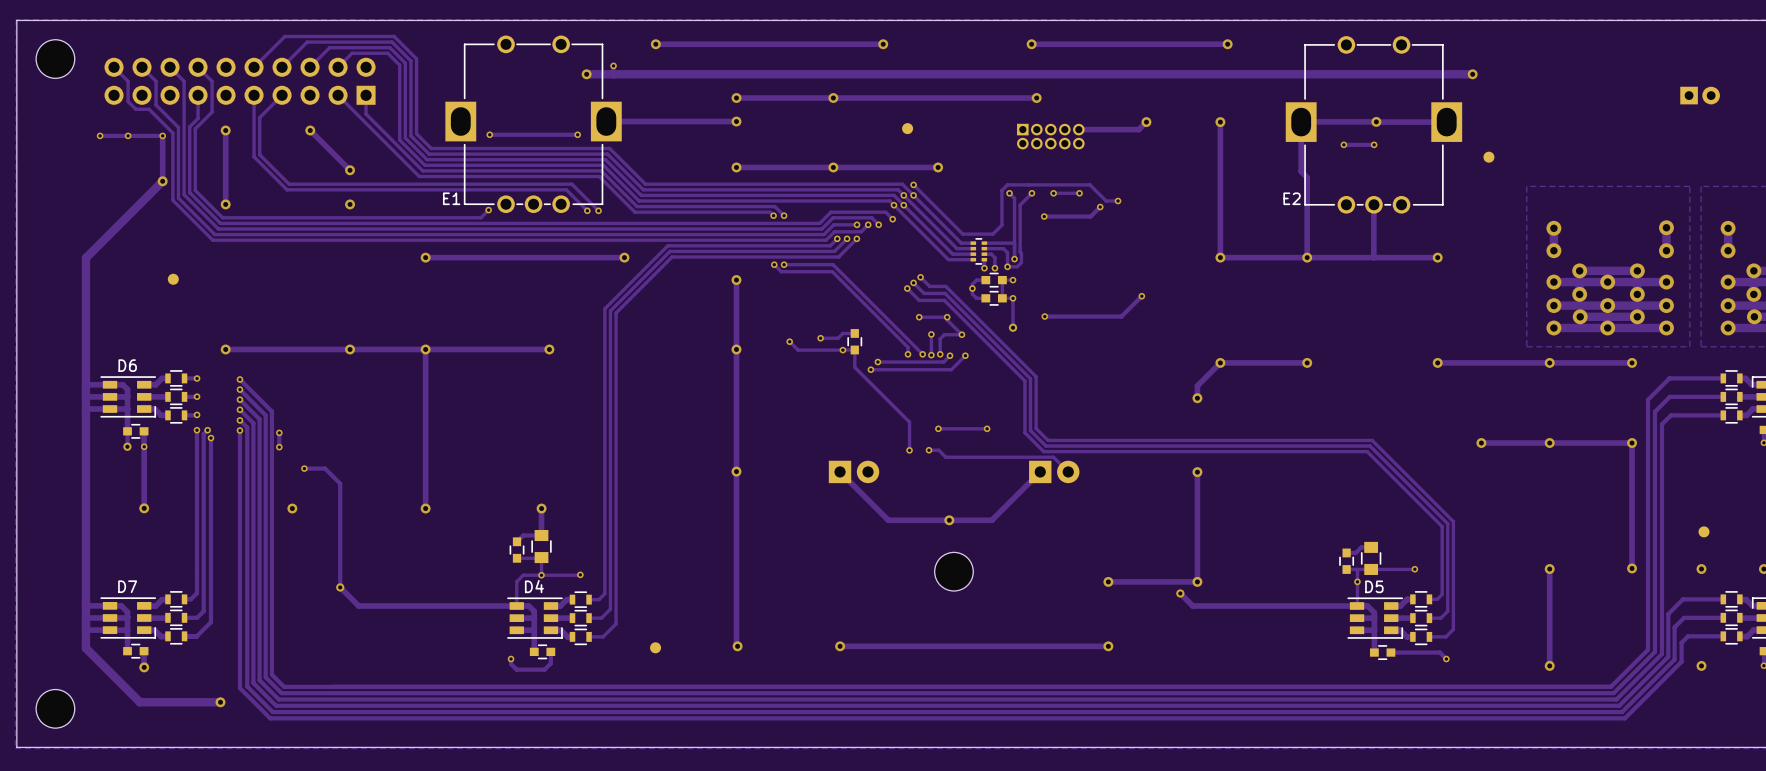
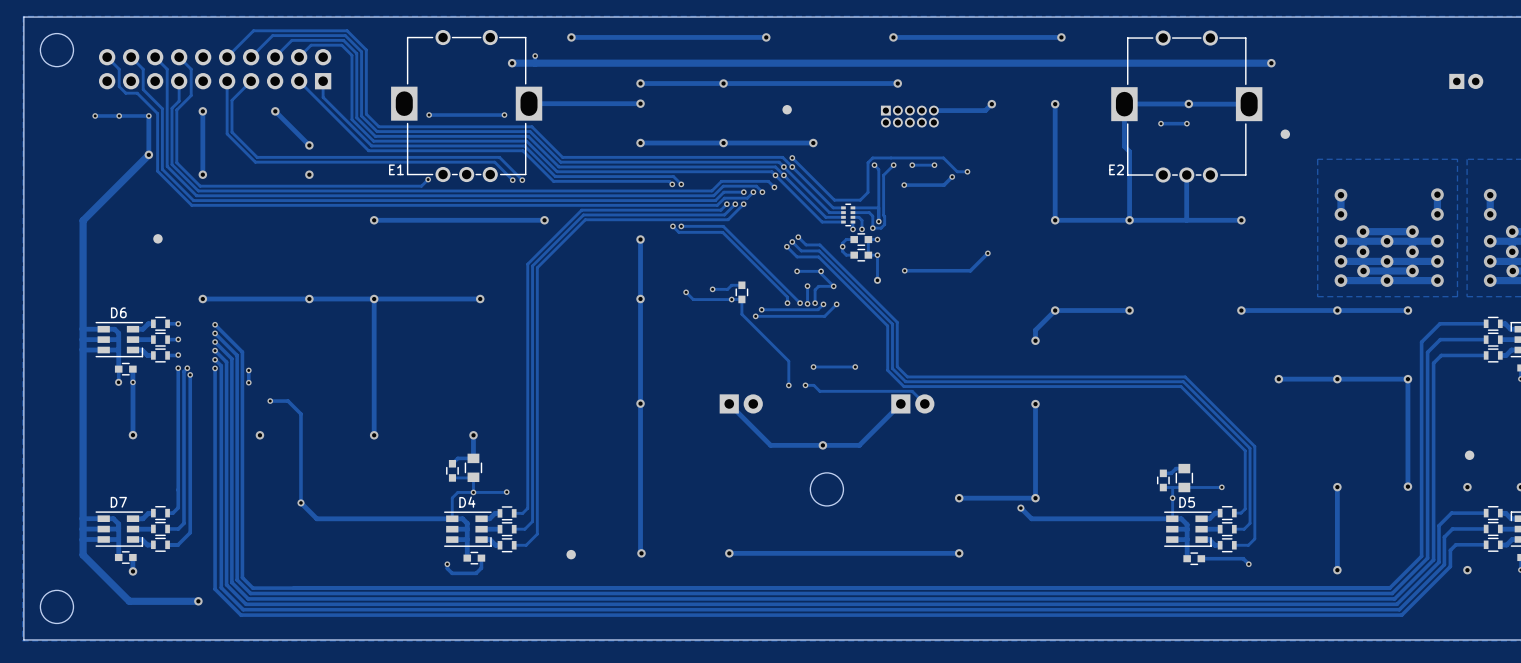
part: (55, 59) -> none
part: (954, 571) -> none
part: (55, 708) -> none

